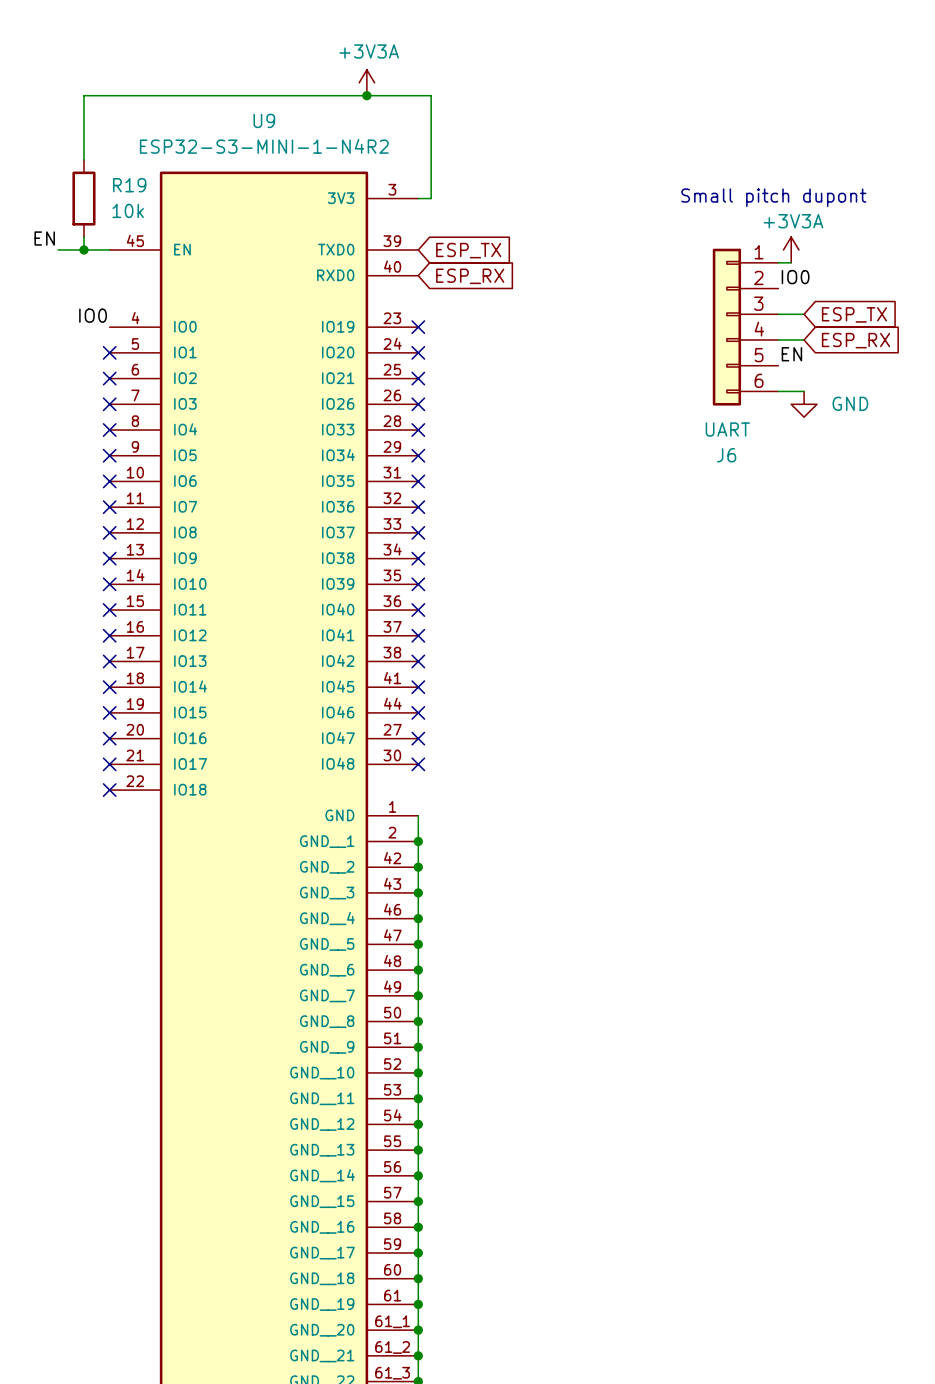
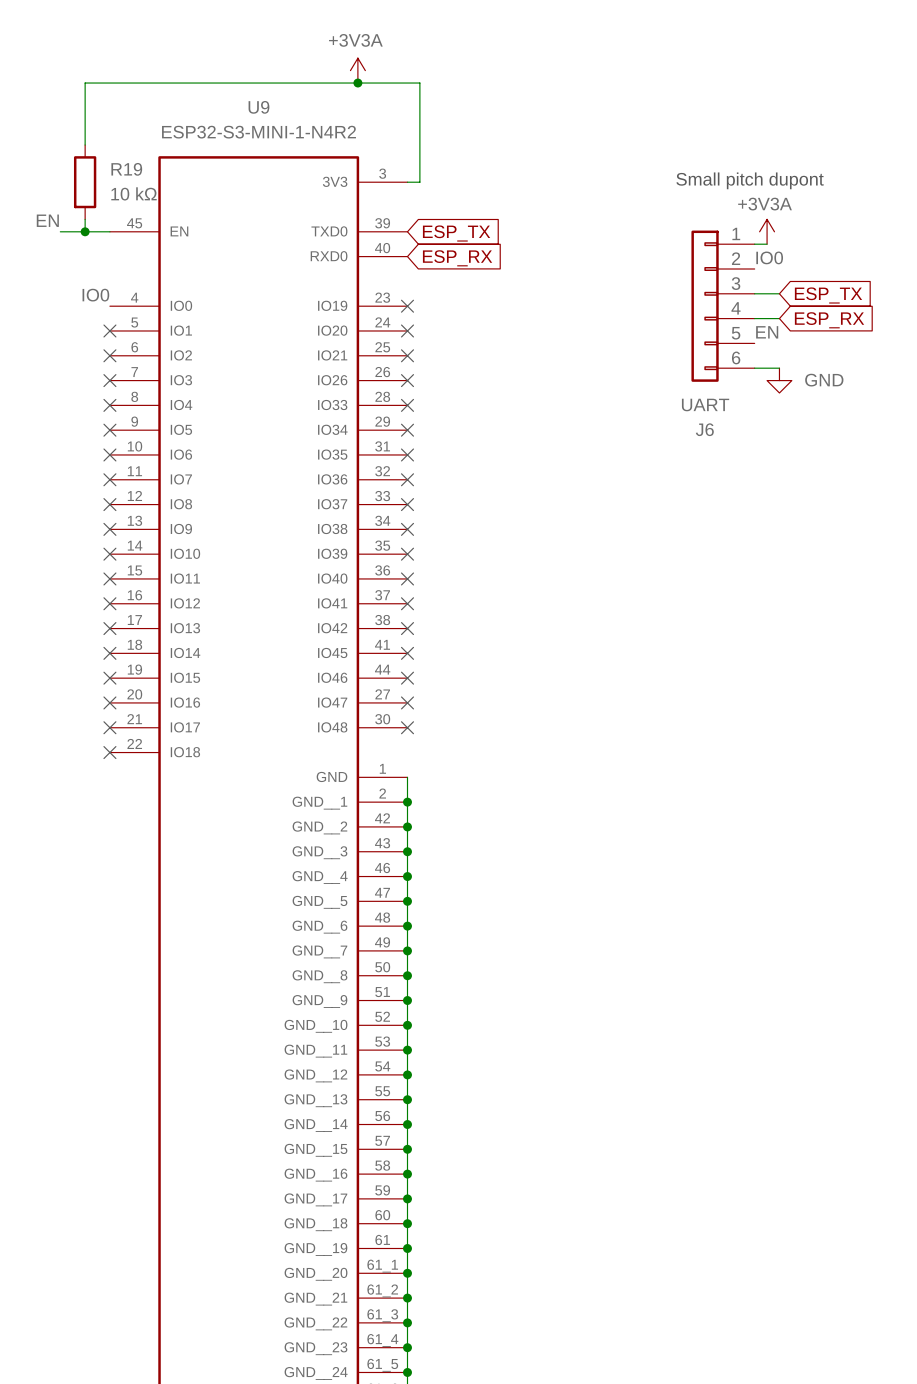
R19 value: 10k (128, 210) -> 10 kΩ (133, 193)

